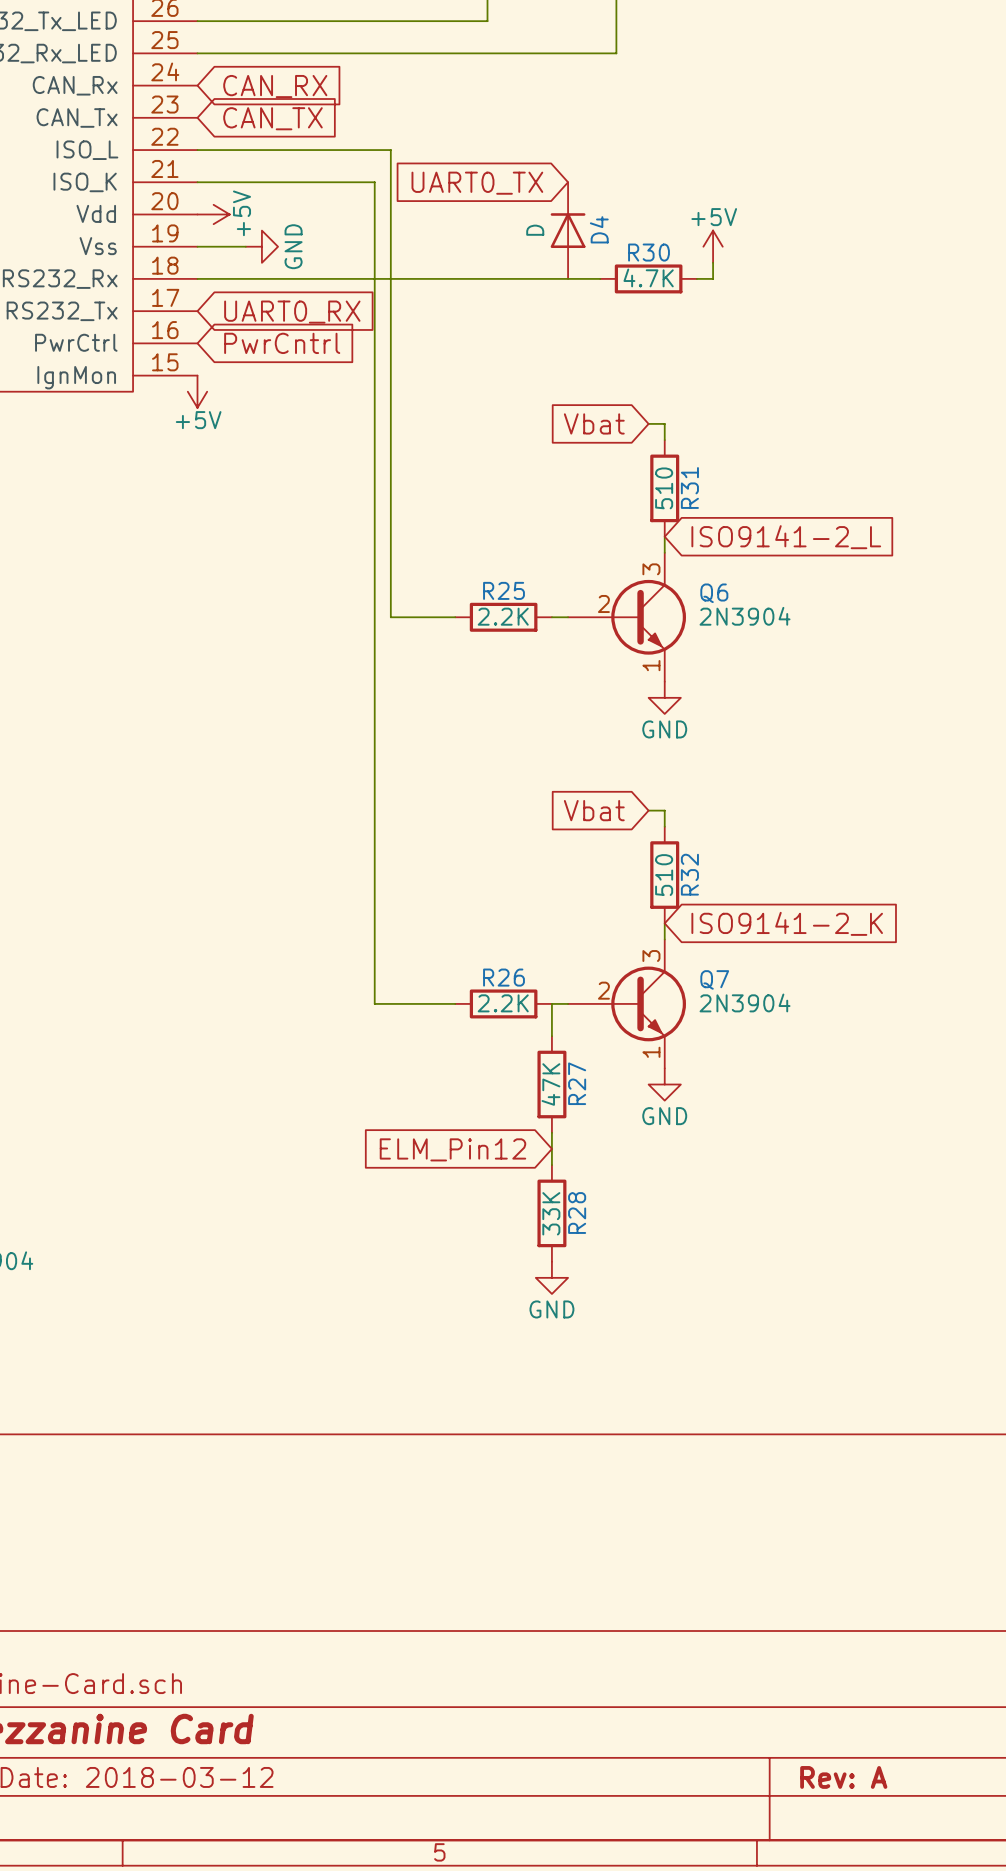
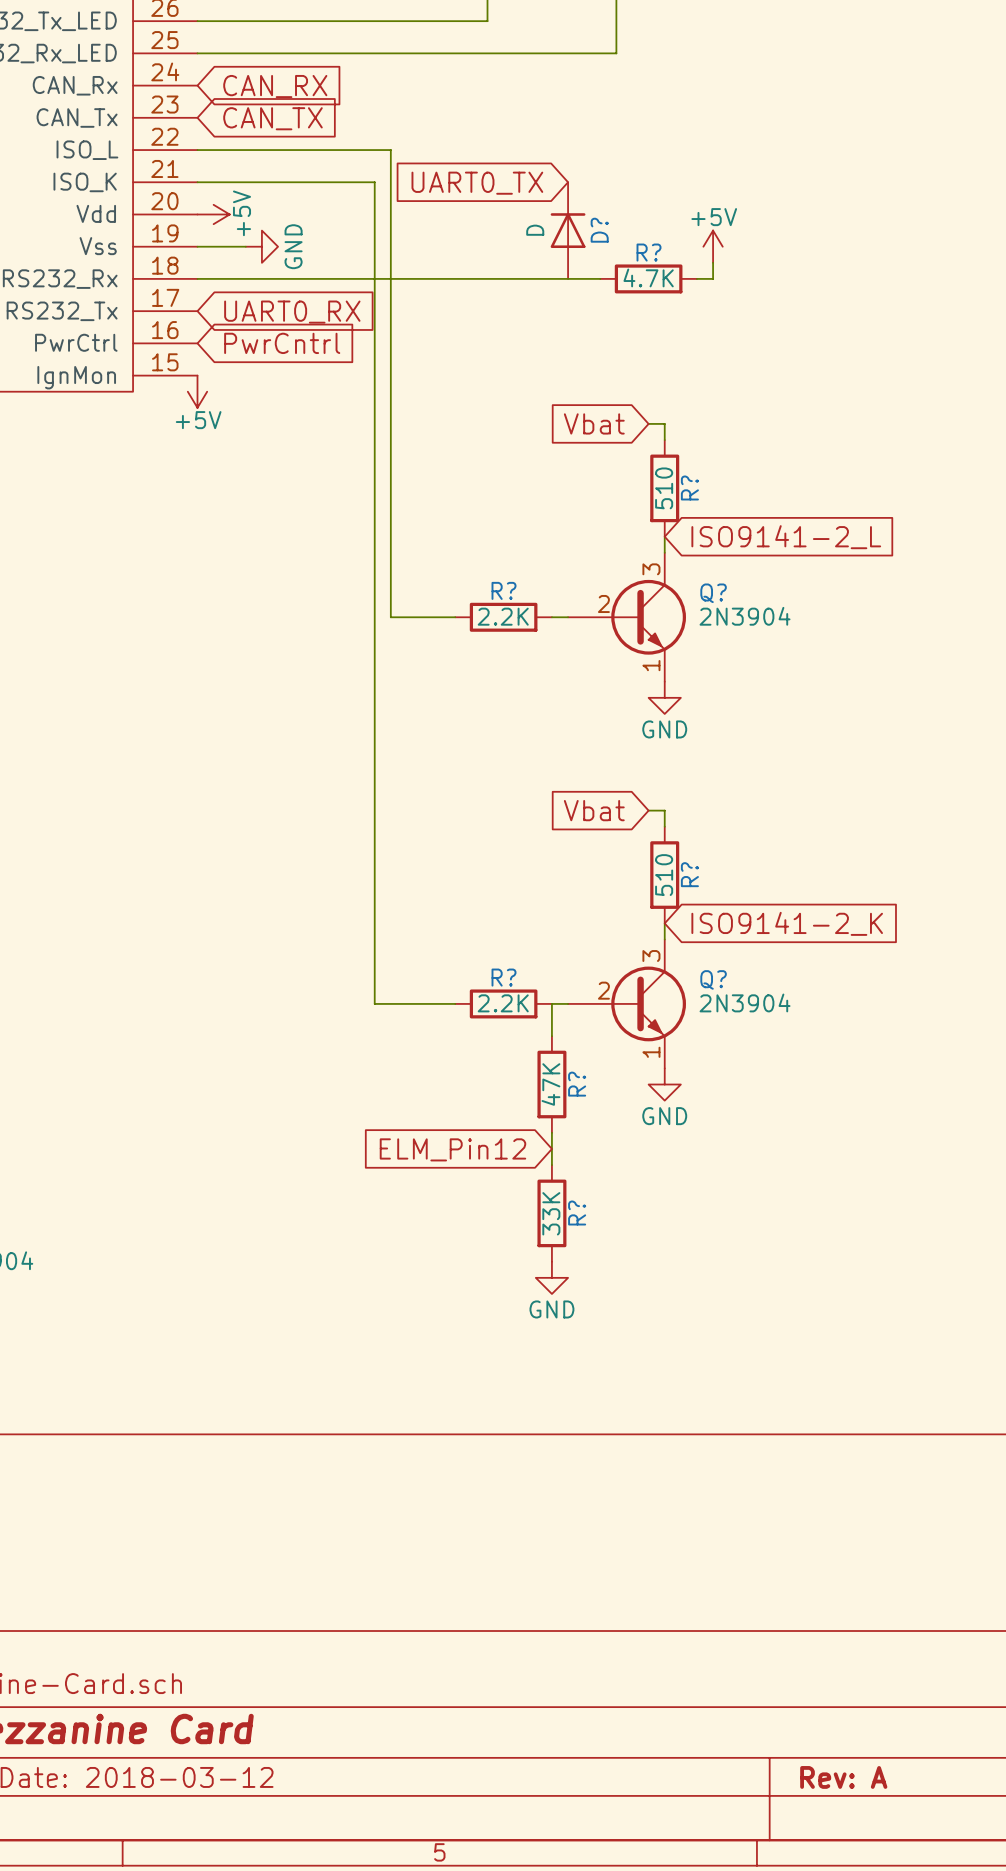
D4 name: D4 (599, 229) -> D? (599, 230)
R30 name: R30 (649, 252) -> R? (649, 252)
R31 name: R31 (689, 488) -> R? (689, 488)
R25 name: R25 (504, 590) -> R? (504, 590)
Q6 name: Q6 (714, 593) -> Q? (713, 593)
R32 name: R32 (689, 874) -> R? (689, 874)
R26 name: R26 (504, 977) -> R? (504, 977)
Q7 name: Q7 (714, 979) -> Q? (713, 979)
R27 name: R27 (577, 1083) -> R? (577, 1084)
R28 name: R28 (577, 1213) -> R? (577, 1213)

